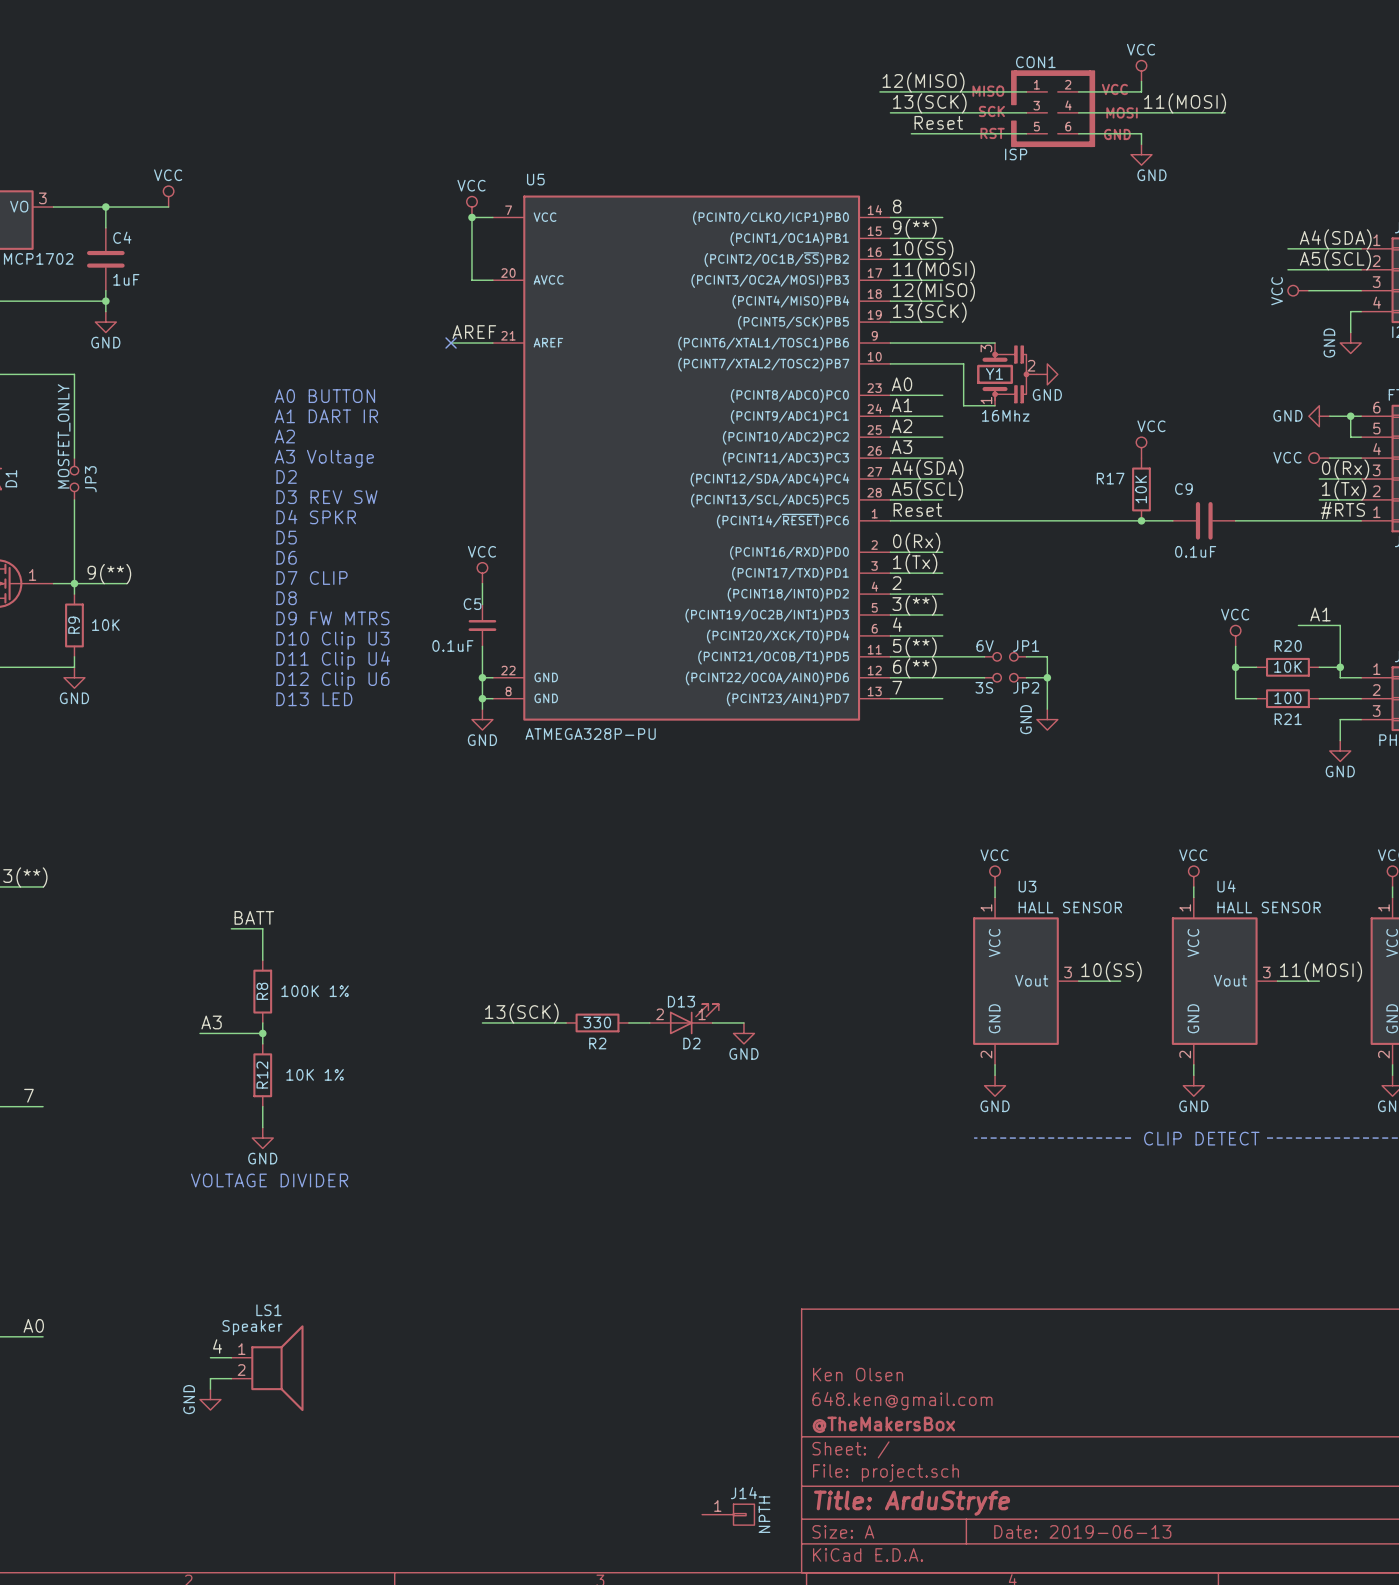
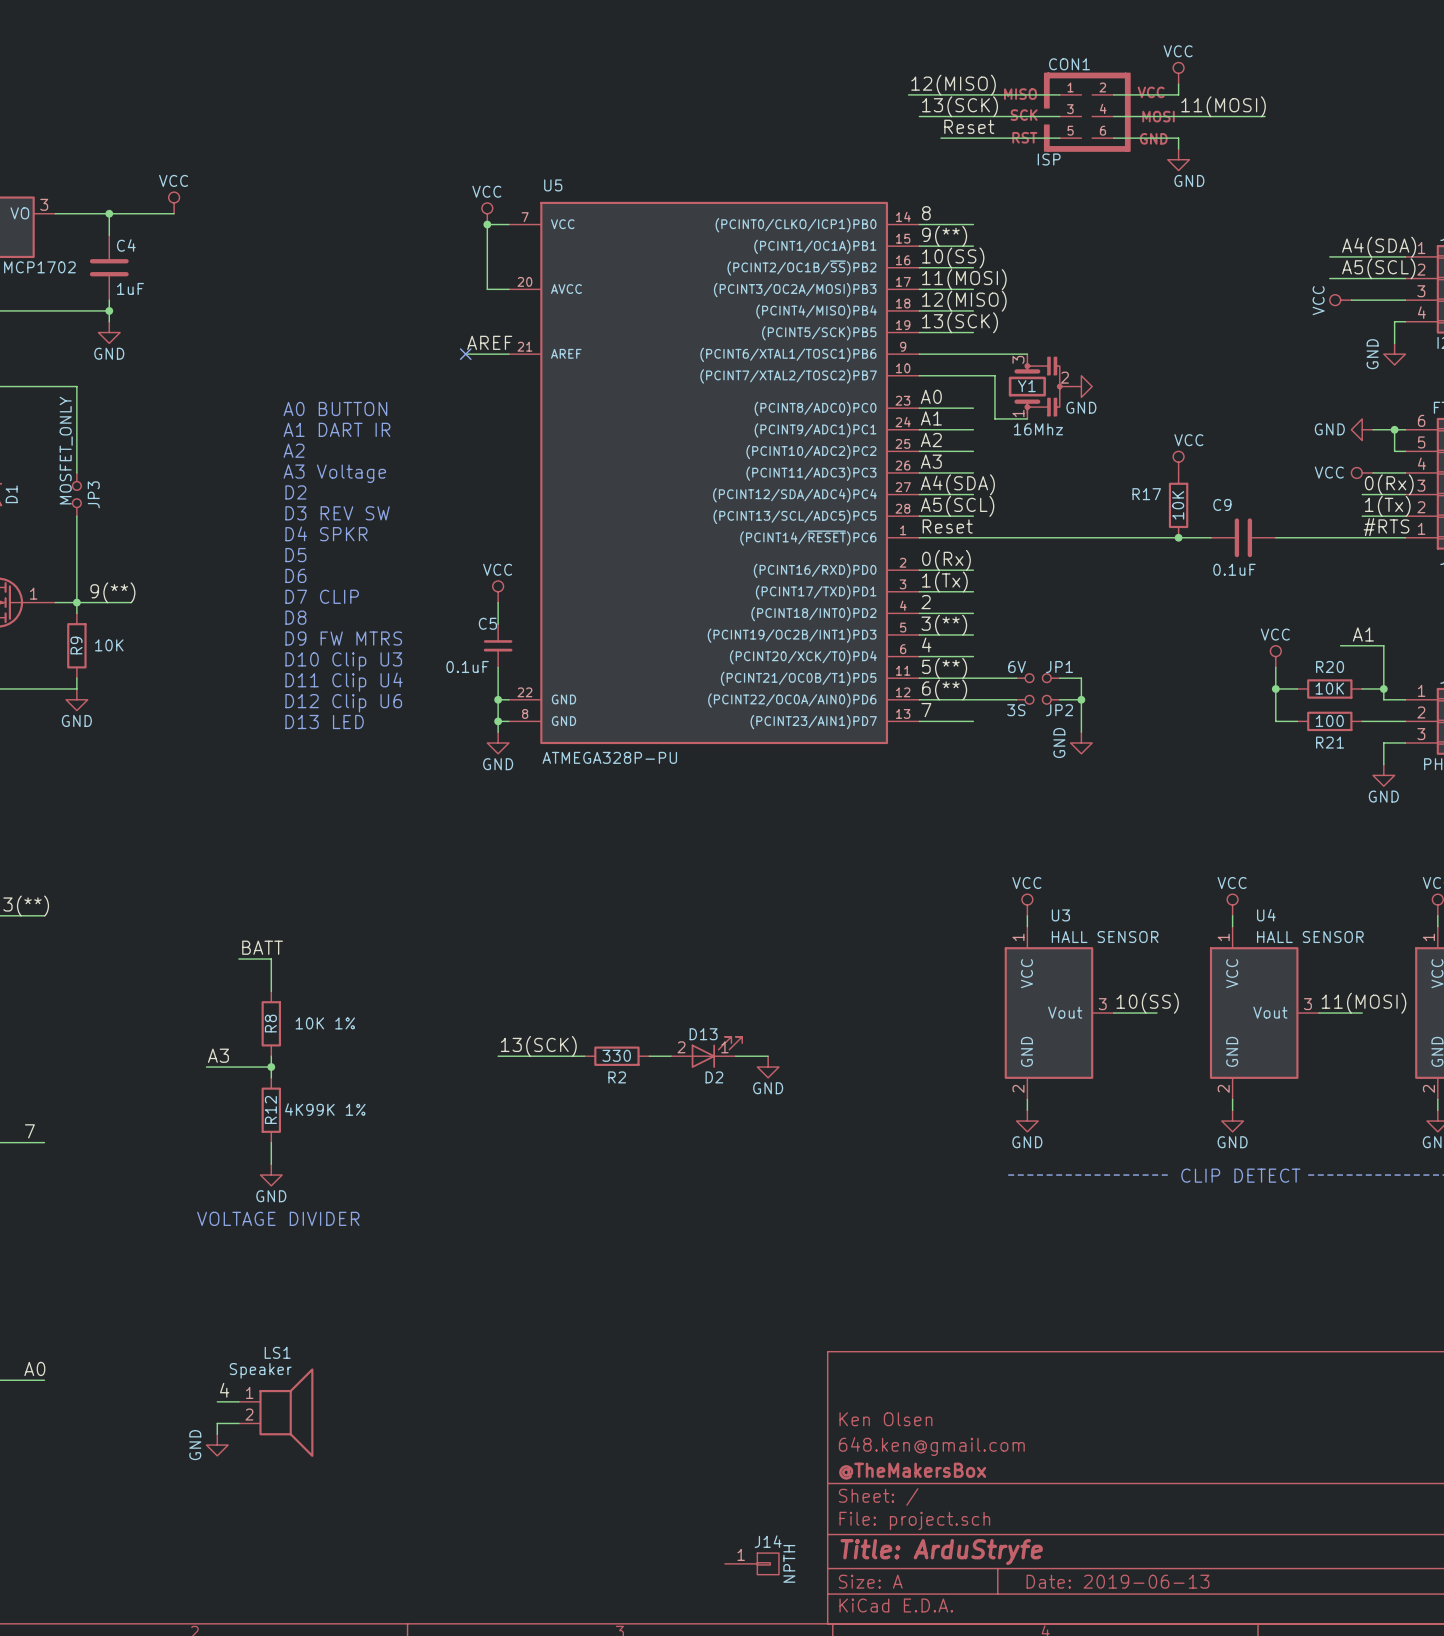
R8 value: 100K 1% (315, 991) -> 10K 1% (325, 1023)
R12 value: 10K 1% (315, 1074) -> 4K99K 1% (325, 1109)

